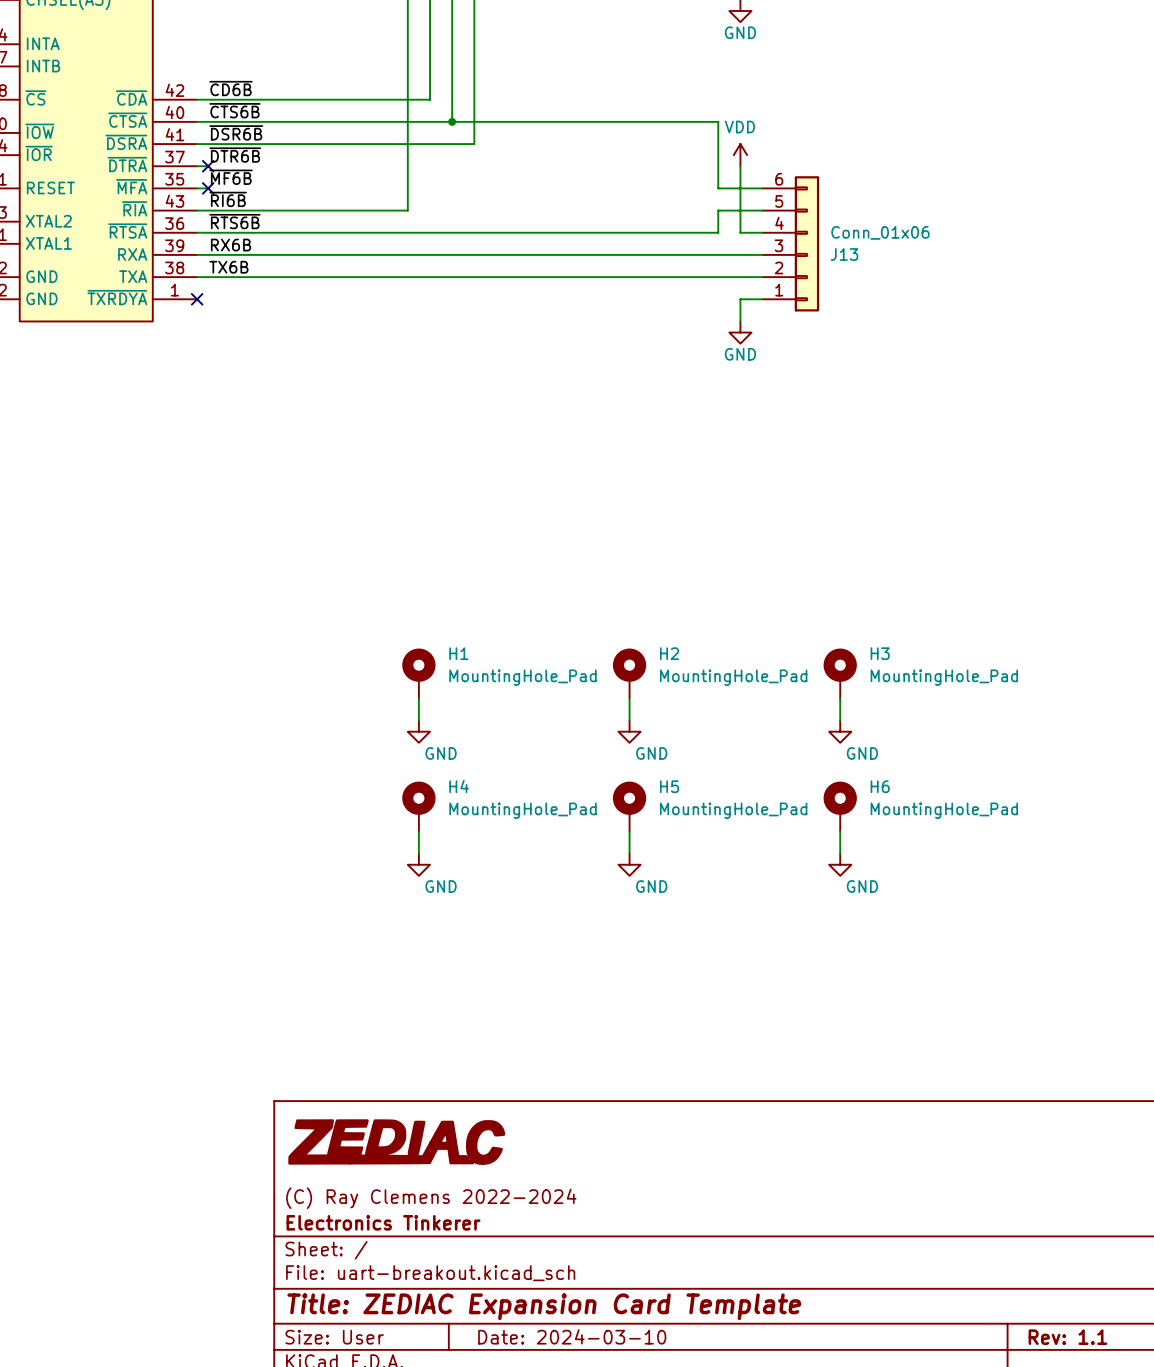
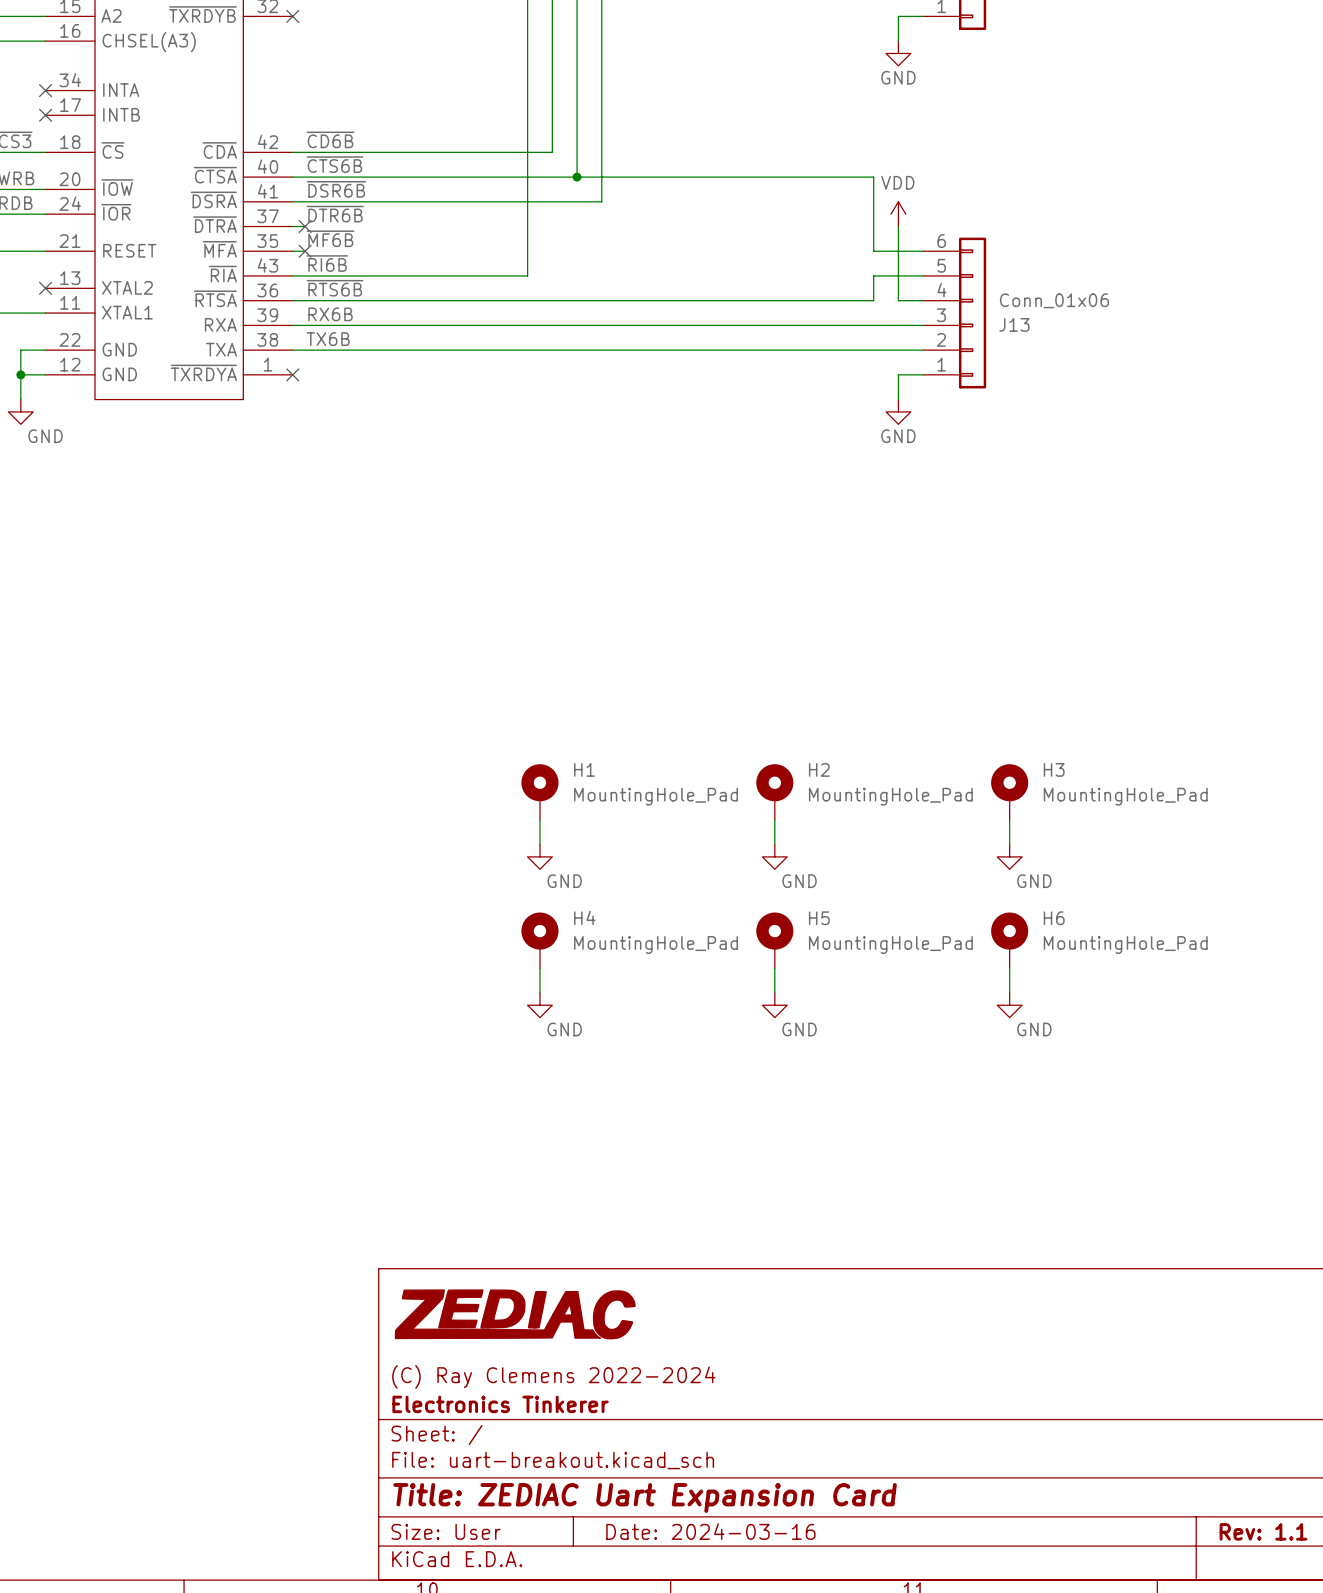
title block: Title: ZEDIAC Expansion Card Template (544, 1306) -> Title: ZEDIAC Uart Expansion Card (645, 1497)
title block: Date: 2024-03-10 (572, 1336) -> Date: 2024-03-16 (710, 1531)

